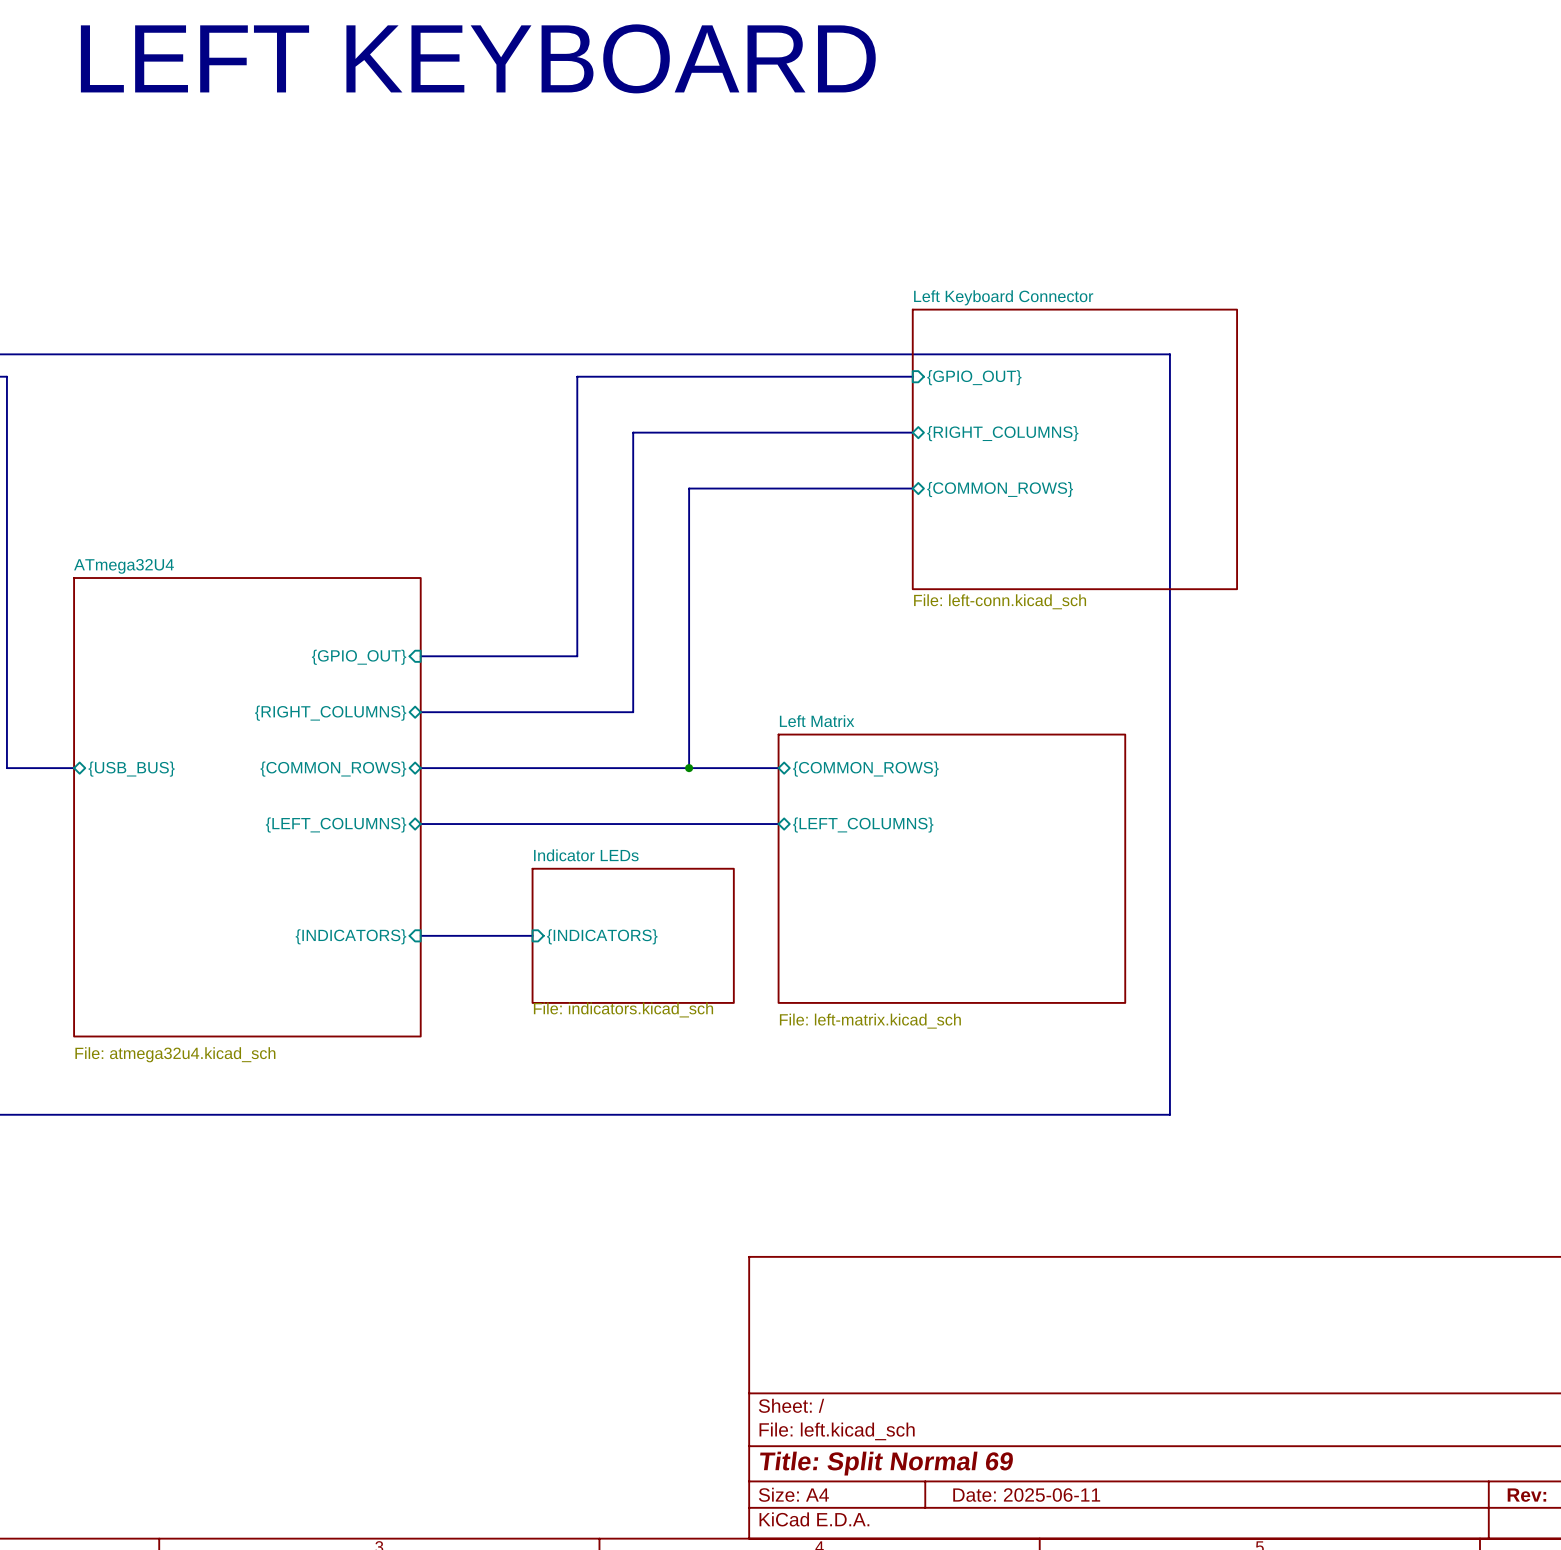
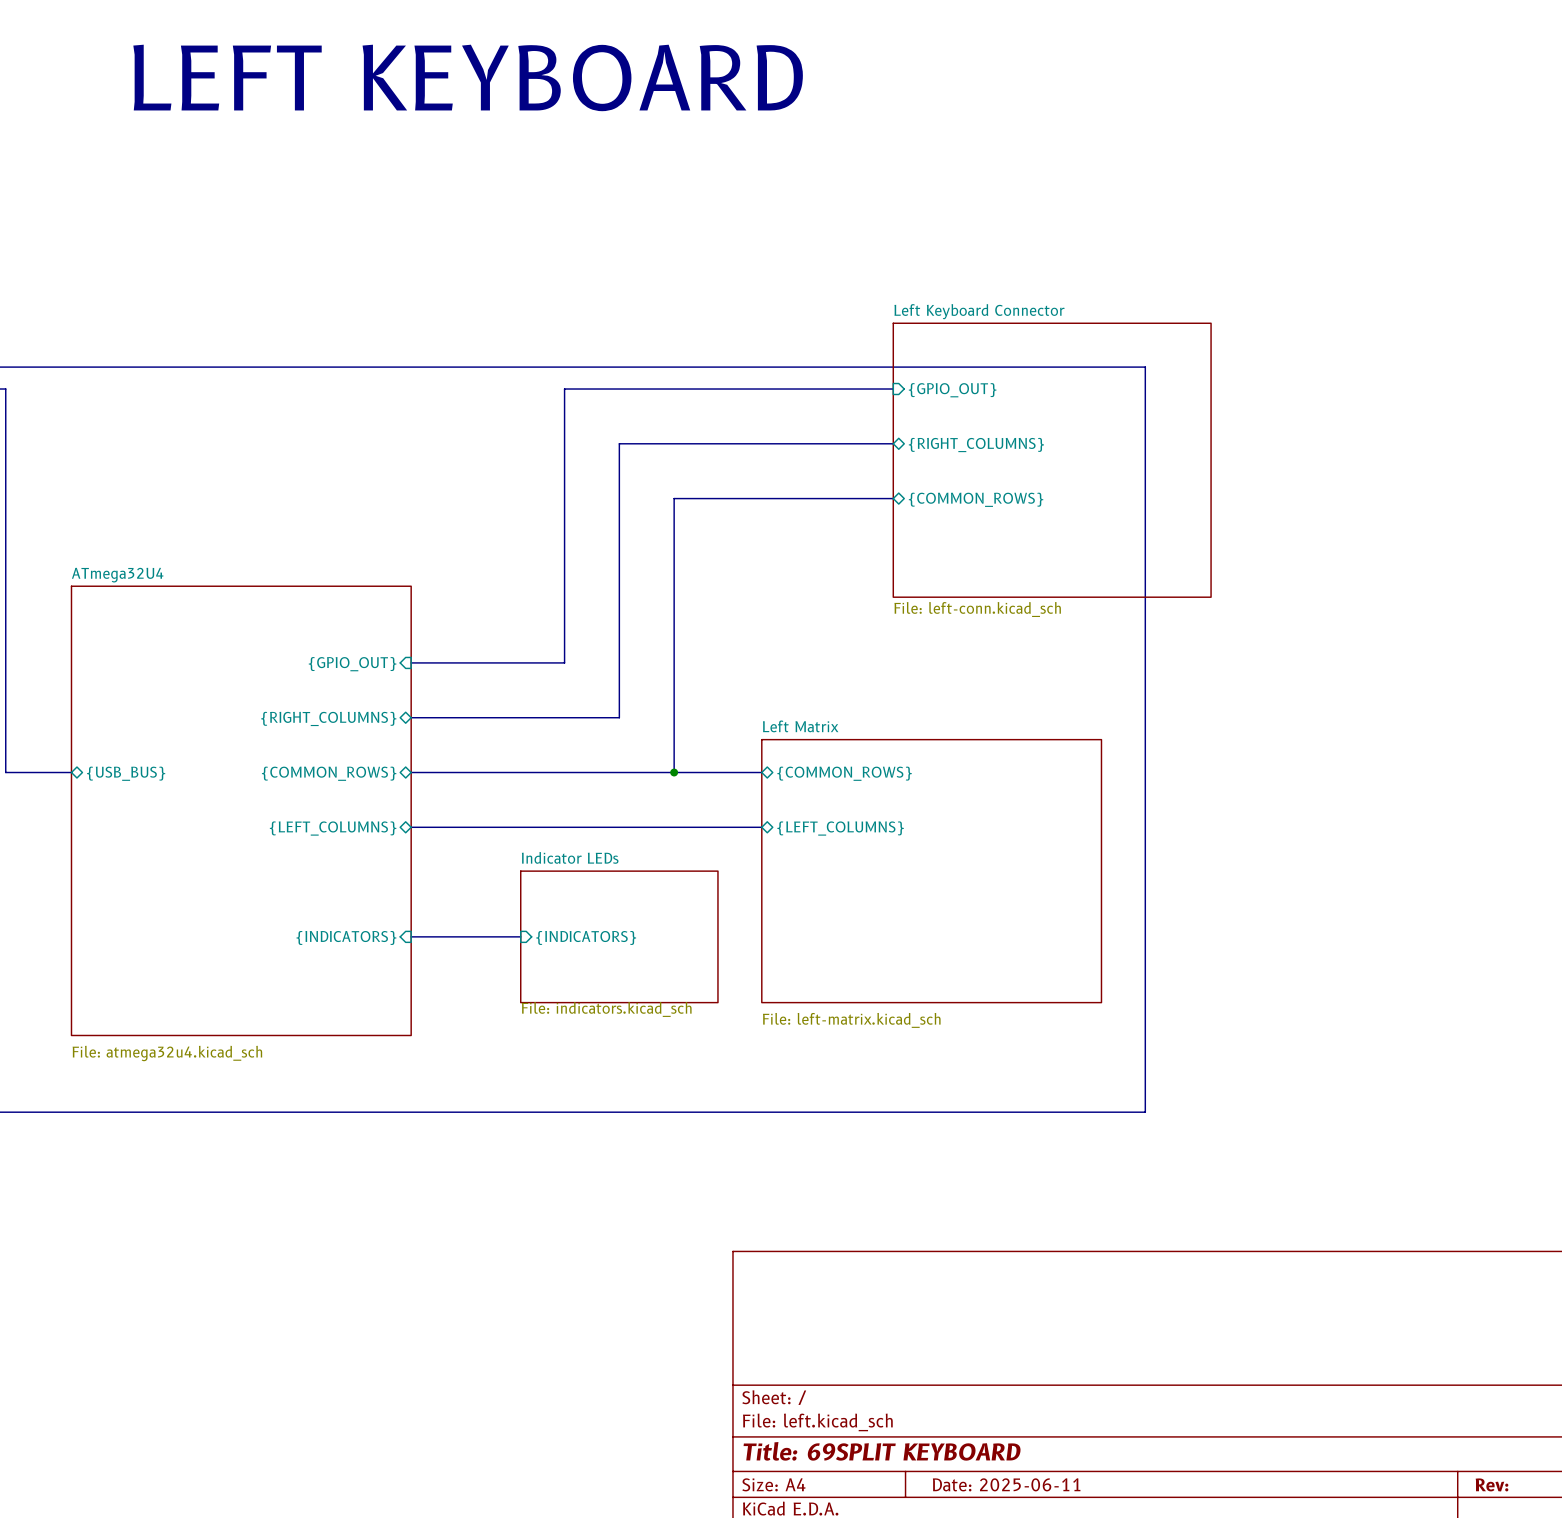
title block: Title: Split Normal 69 (886, 1463) -> Title: 69SPLIT KEYBOARD (882, 1451)

